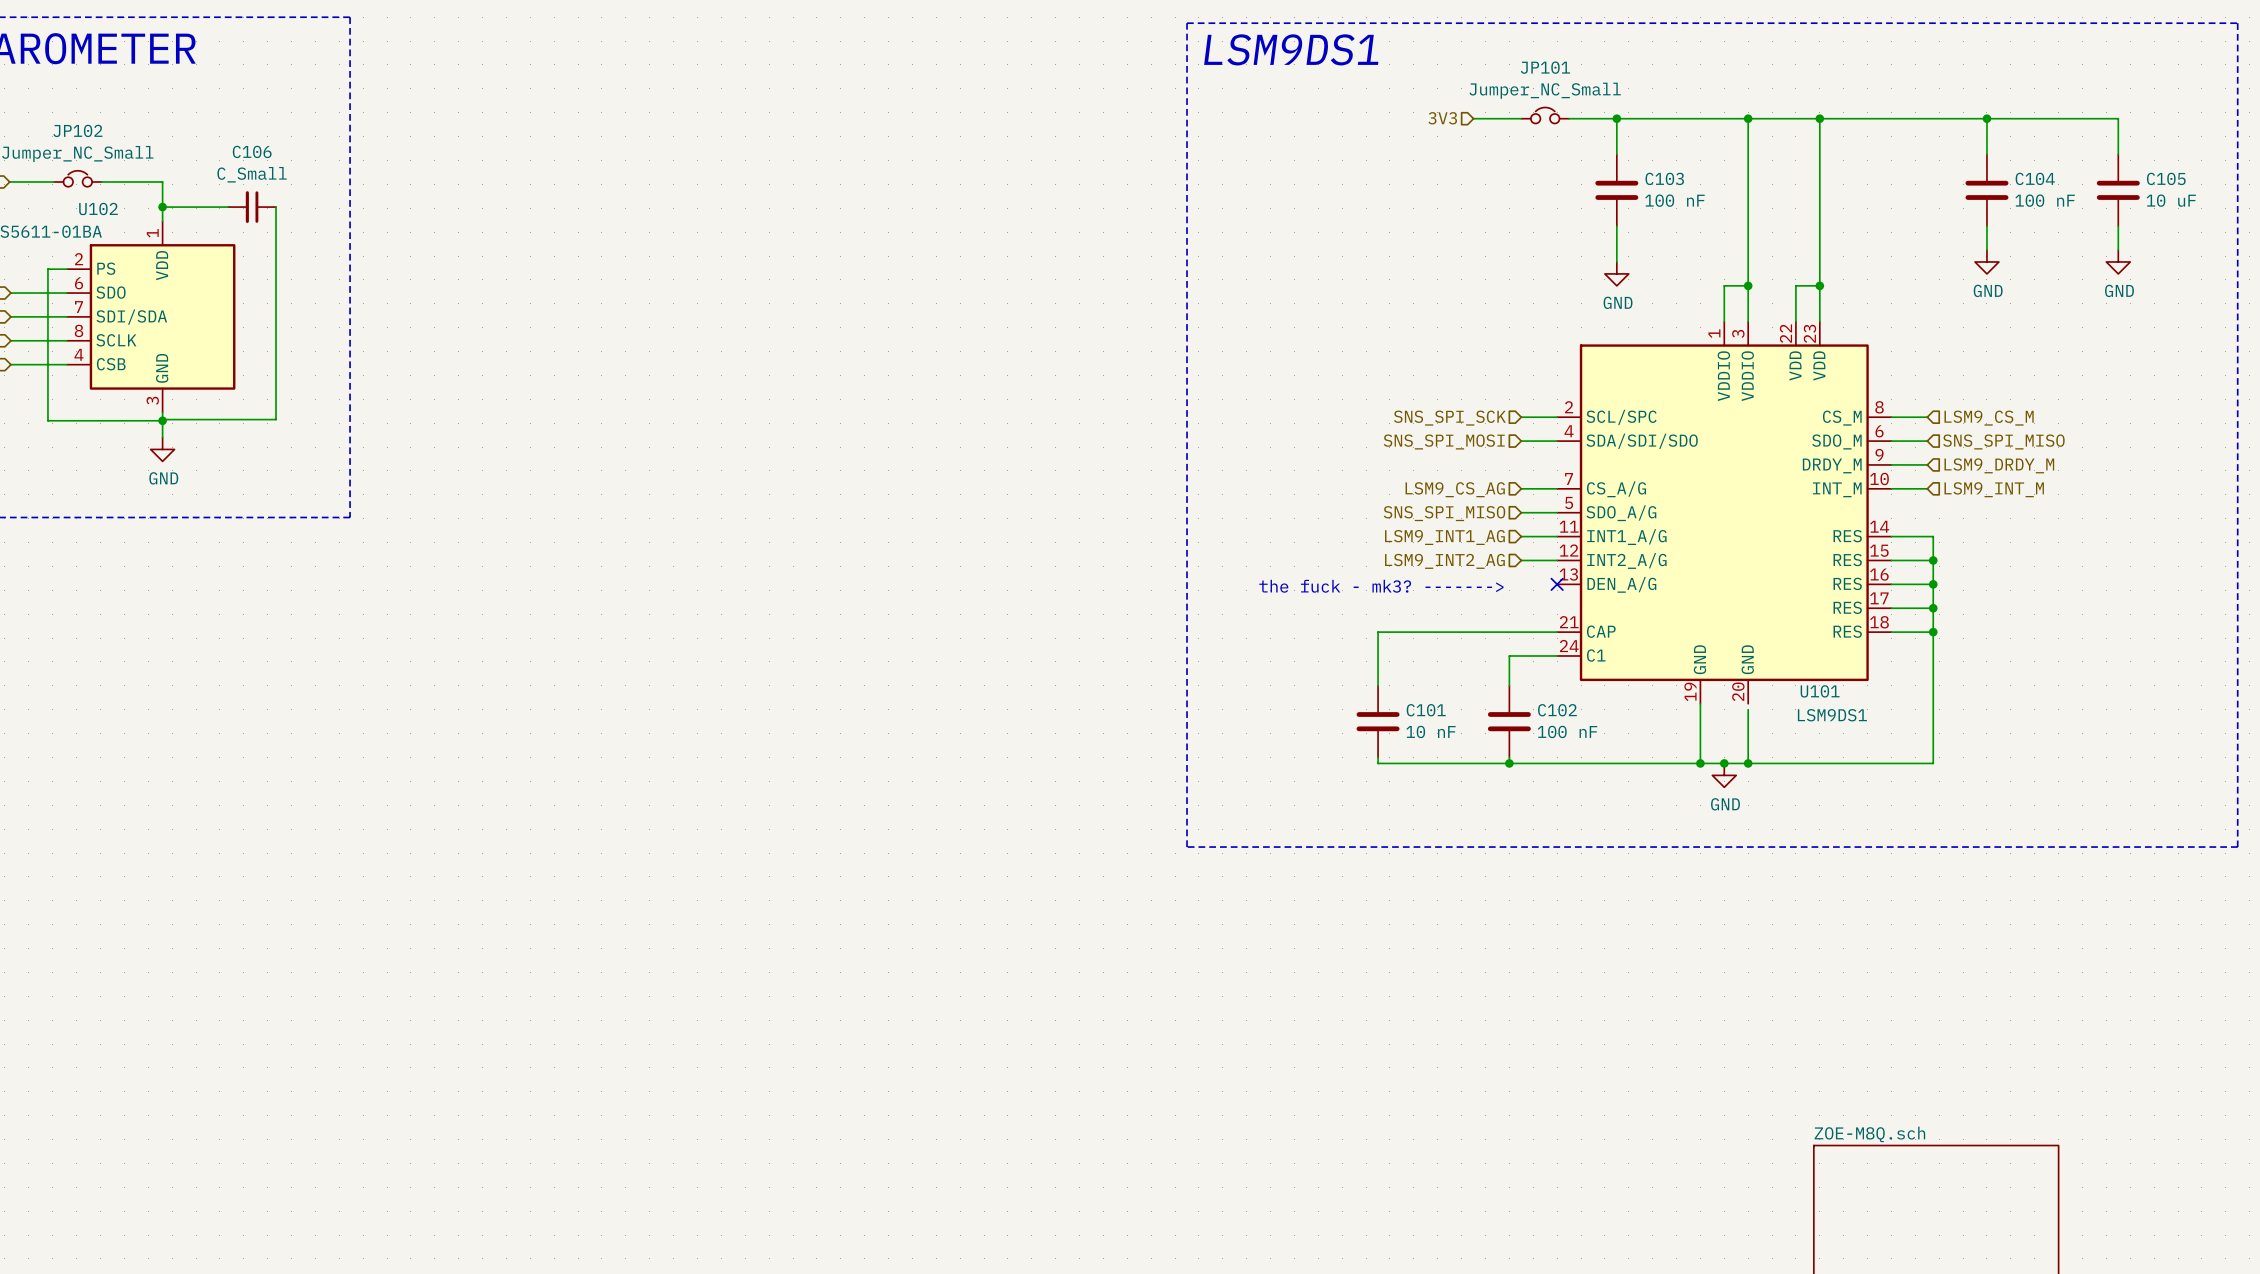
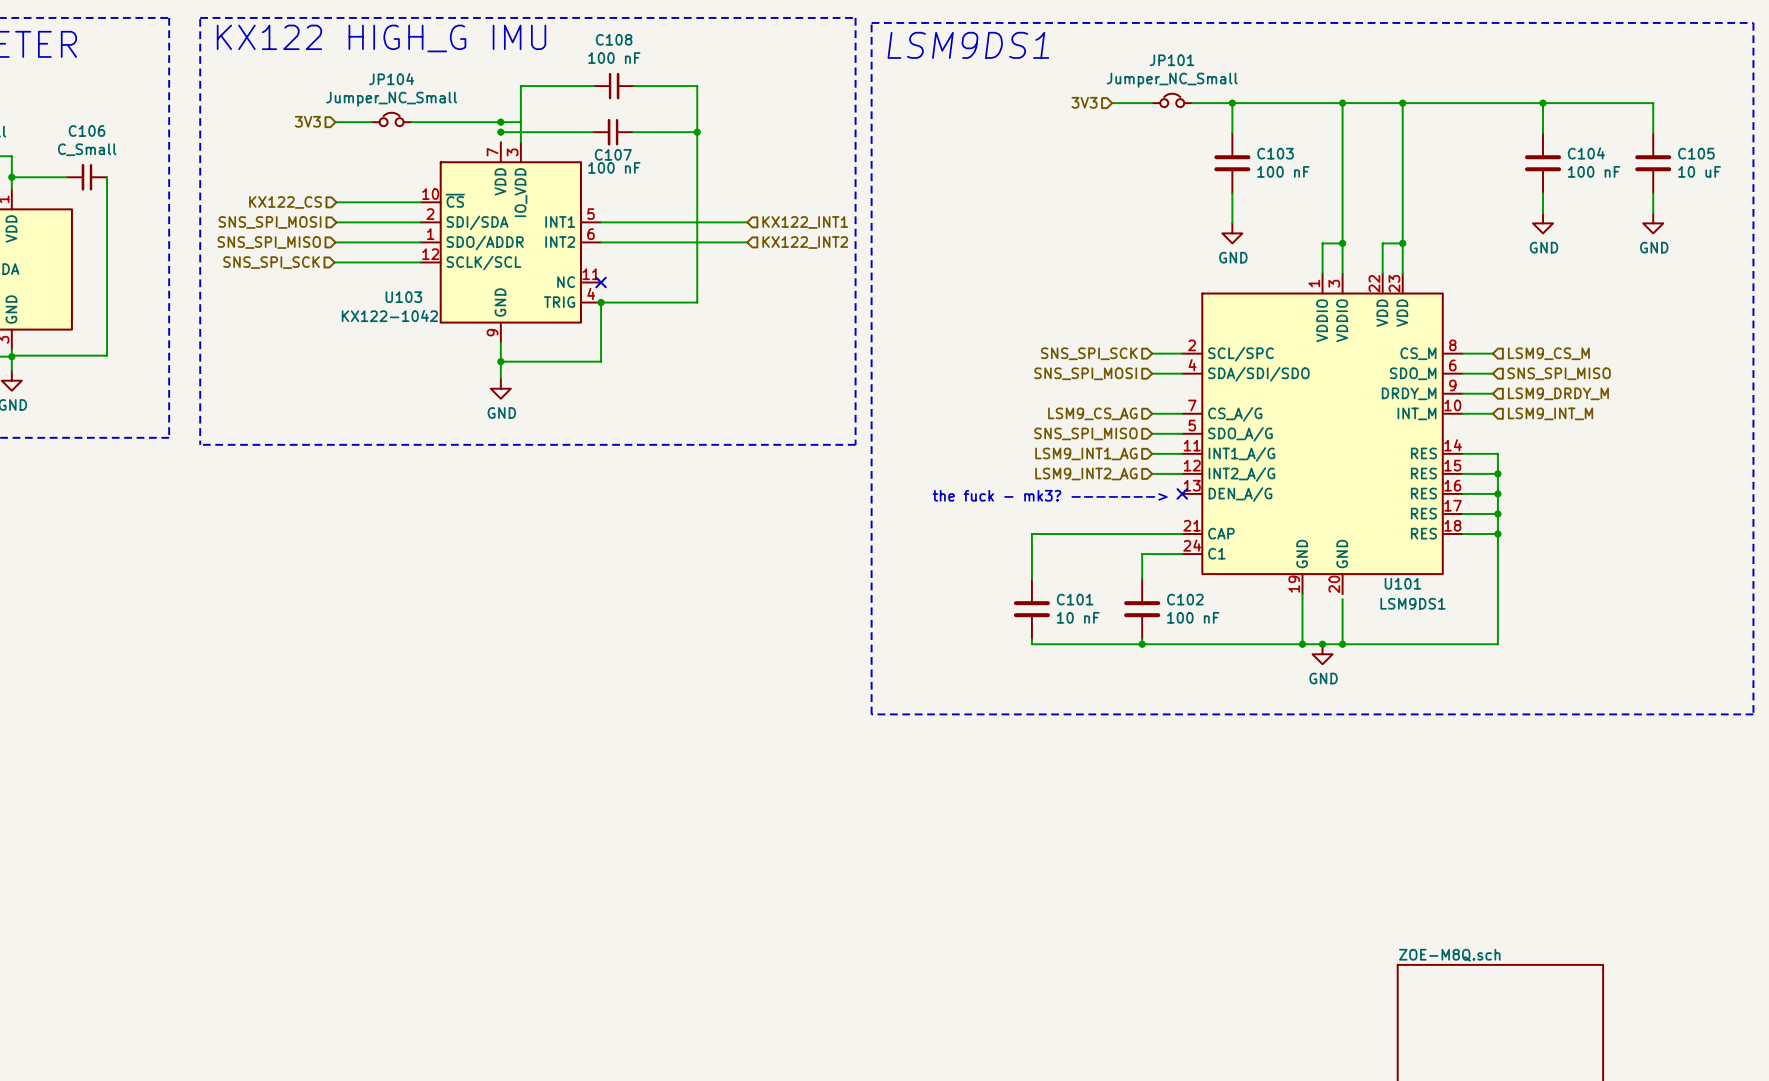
line: none -> (200, 17) (855, 17) (855, 444) (200, 444) (200, 18)
text: none -> KX122 HIGH_G IMU (381, 38)
wire: none -> (594, 86) (520, 86) (520, 142)
C108: none -> 100 nF (614, 86)
wire: none -> (634, 86) (697, 86) (697, 302) (601, 302) (601, 361) (500, 361)
JP104: none -> Jumper_NC_Small (391, 119)
hierarchical label: none -> 3V3 (307, 121)
wire: none -> (335, 122) (371, 122)
wire: none -> (411, 122) (520, 122)
junction: none -> (500, 122)
wire: none -> (500, 132) (593, 132)
junction: none -> (500, 132)
C107: none -> 100 nF (613, 132)
wire: none -> (633, 132) (697, 132)
junction: none -> (697, 132)
wire: none -> (336, 202) (420, 202)
hierarchical label: none -> KX122_CS (285, 202)
wire: none -> (336, 222) (420, 222)
wire: none -> (601, 222) (747, 222)
hierarchical label: none -> SNS_SPI_MOSI (270, 222)
hierarchical label: none -> KX122_INT1 (805, 222)
wire: none -> (335, 242) (420, 242)
U103: none -> KX122-1042 (510, 242)
wire: none -> (601, 242) (747, 242)
hierarchical label: none -> SNS_SPI_MISO (269, 242)
hierarchical label: none -> KX122_INT2 (805, 242)
wire: none -> (334, 262) (420, 262)
hierarchical label: none -> SNS_SPI_SCK (271, 262)
no-connect mark: none -> (601, 282)
junction: none -> (601, 302)
wire: none -> (500, 342) (500, 378)
junction: none -> (500, 361)
power symbol: none -> GND (500, 388)

